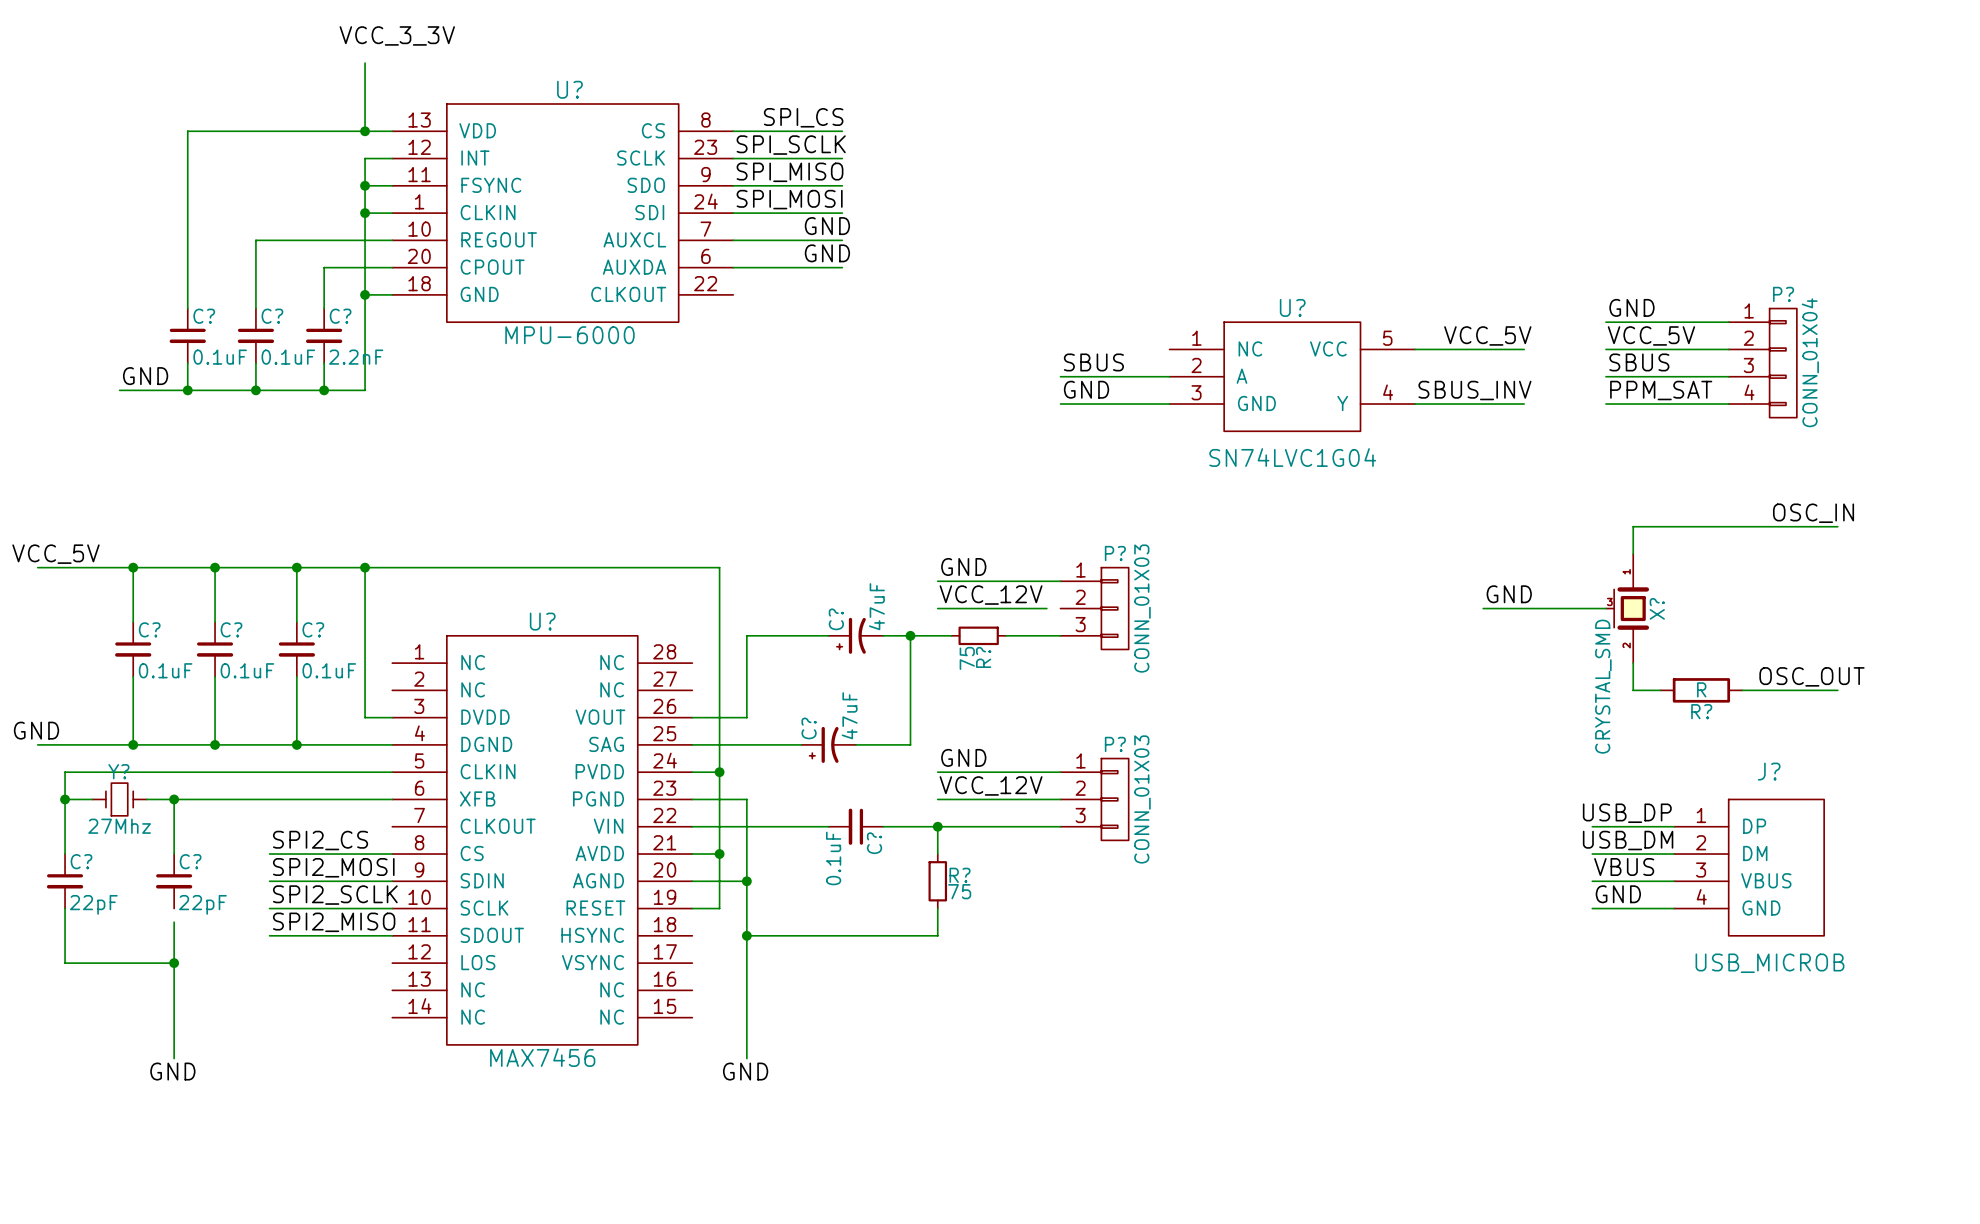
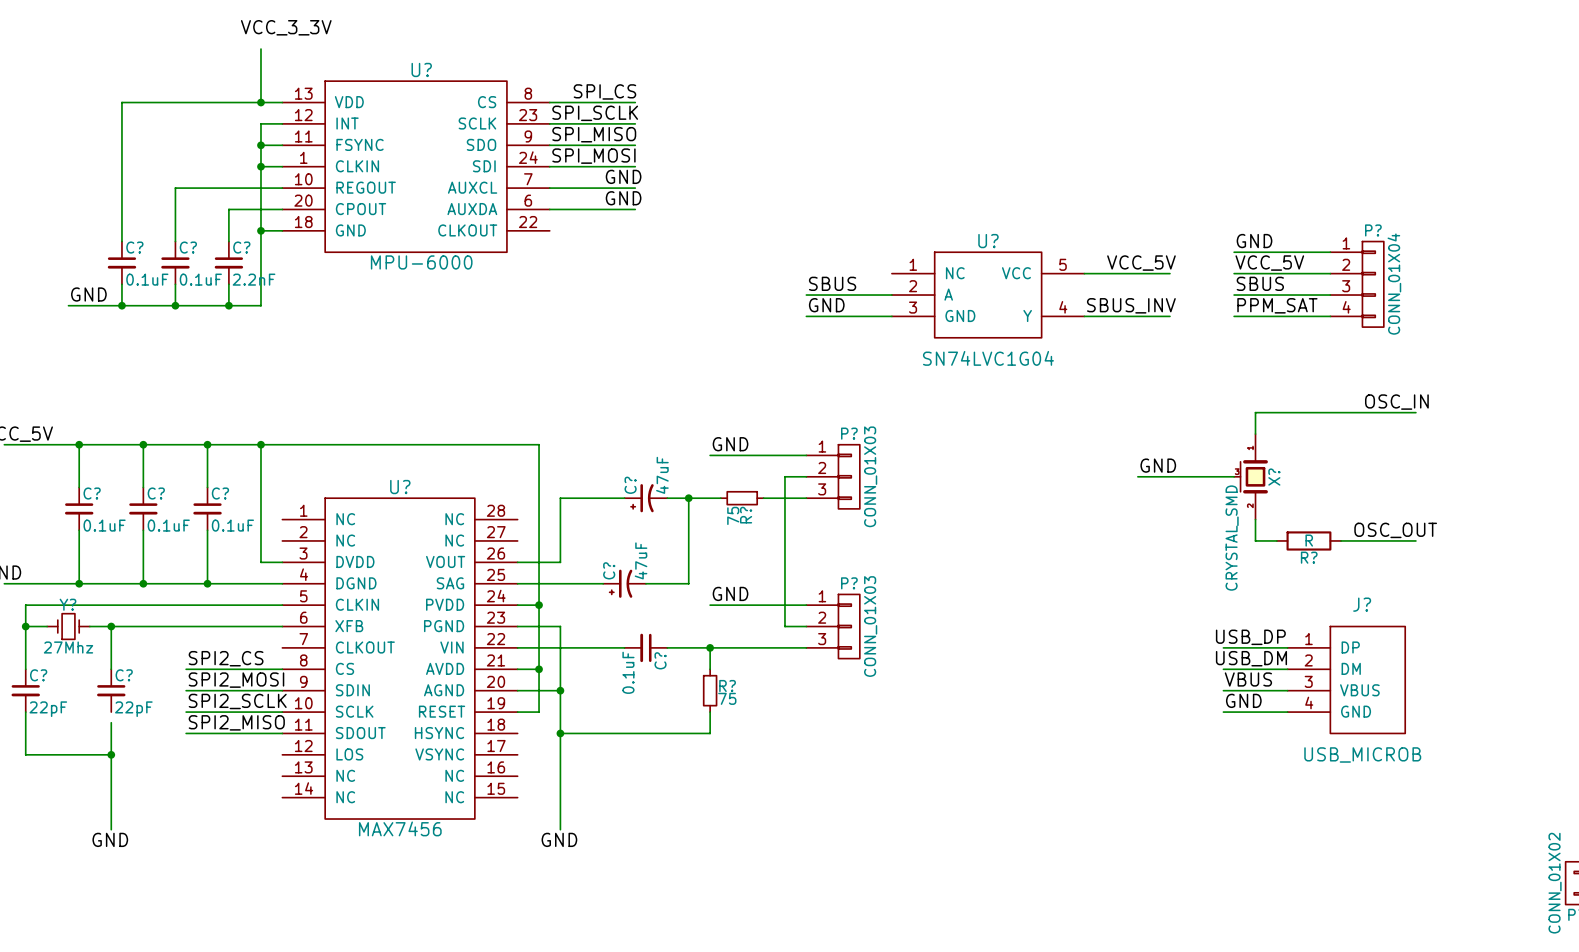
label: VCC_12V (991, 595) -> none
wire: (937, 608) (1033, 608) -> (784, 626) (784, 476)
wire: none -> (795, 476) (806, 476)
label: VCC_12V (991, 785) -> none
wire: (937, 799) (1033, 799) -> none

